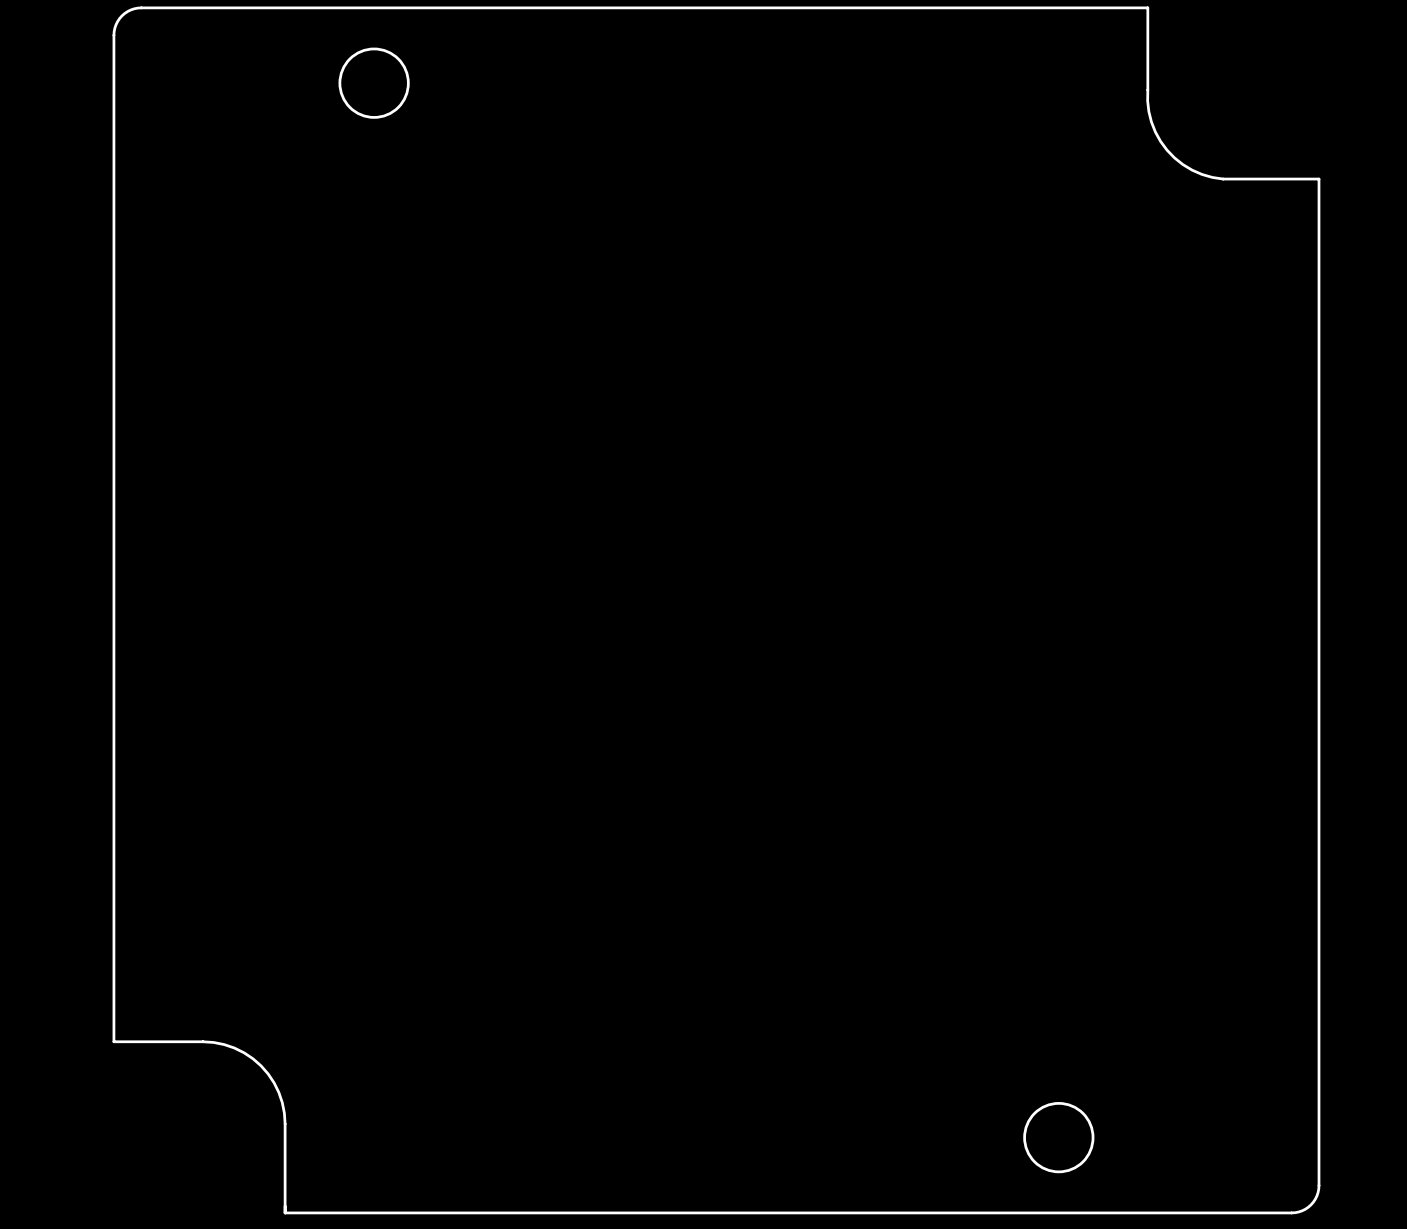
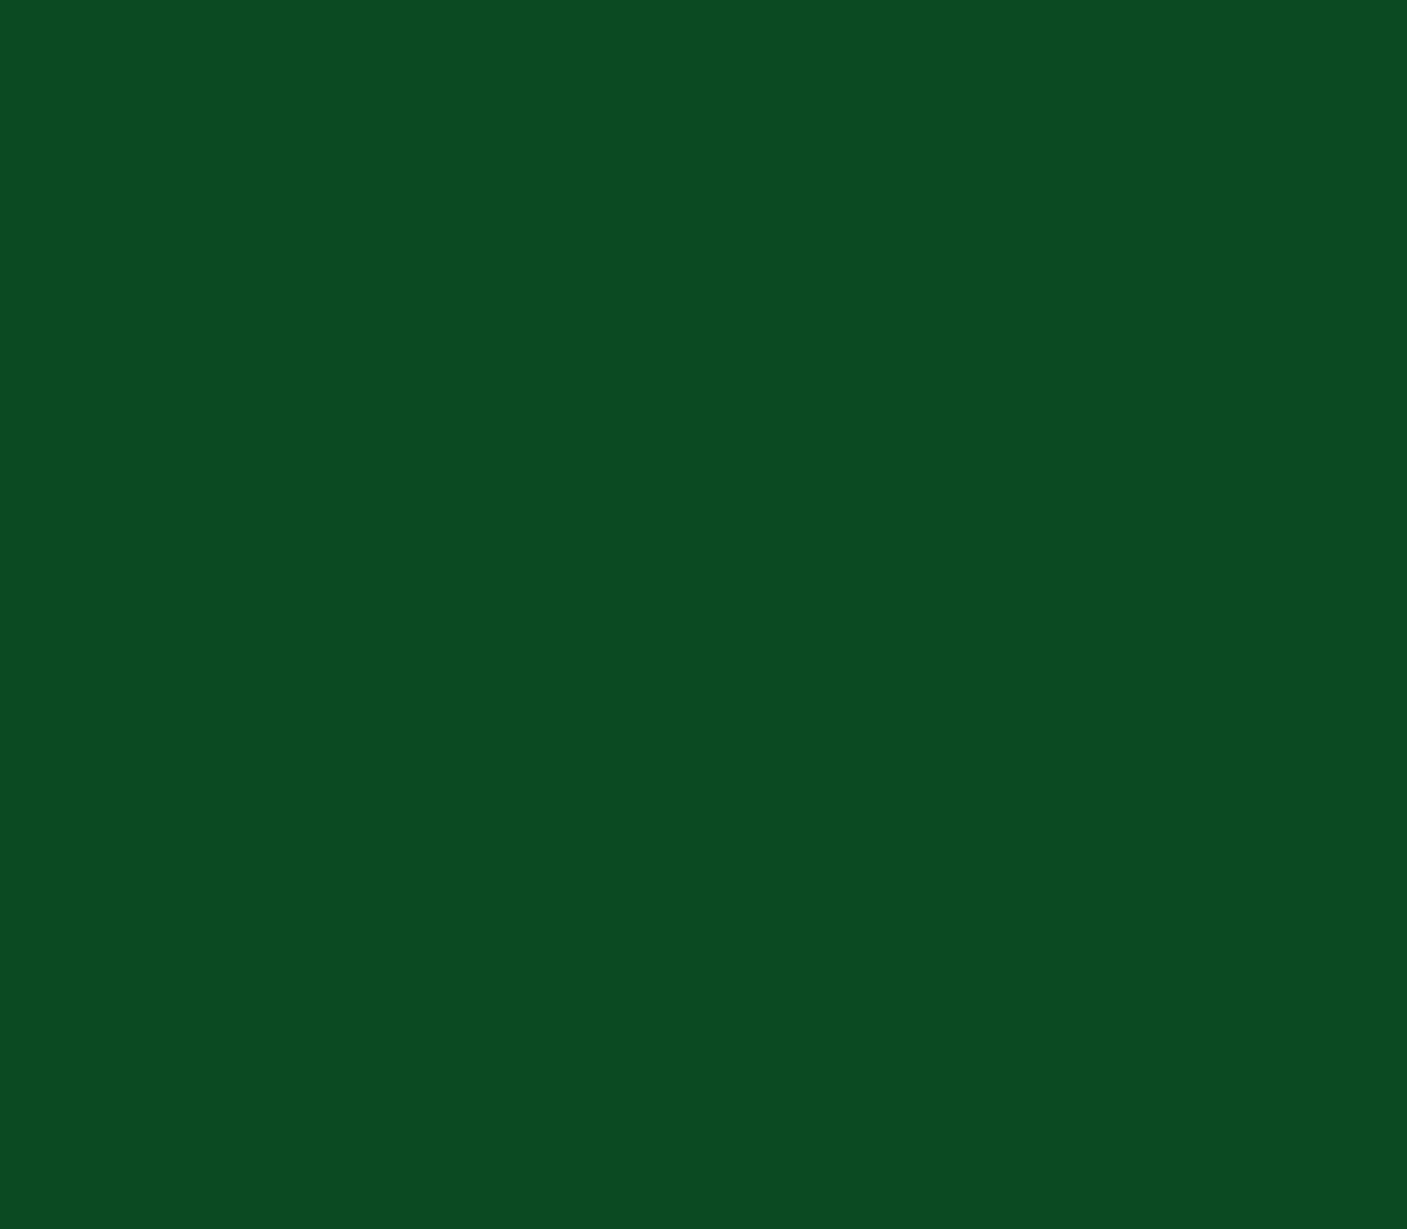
board edge: (141, 7) (1147, 7) (1148, 111) (1160, 141) (1174, 157) (1192, 170) (1223, 179) (1318, 179) (1318, 1185) (1316, 1196) (1310, 1204) (1302, 1210) (1291, 1212) (285, 1212) (284, 1113) (274, 1082) (261, 1065) (244, 1052) (213, 1042) (113, 1041) (113, 35) (116, 24) (121, 15) (130, 9) (141, 7) -> none
round board edge: [338, 47, 410, 119] -> none
round board edge: [1023, 1102, 1095, 1174] -> none

